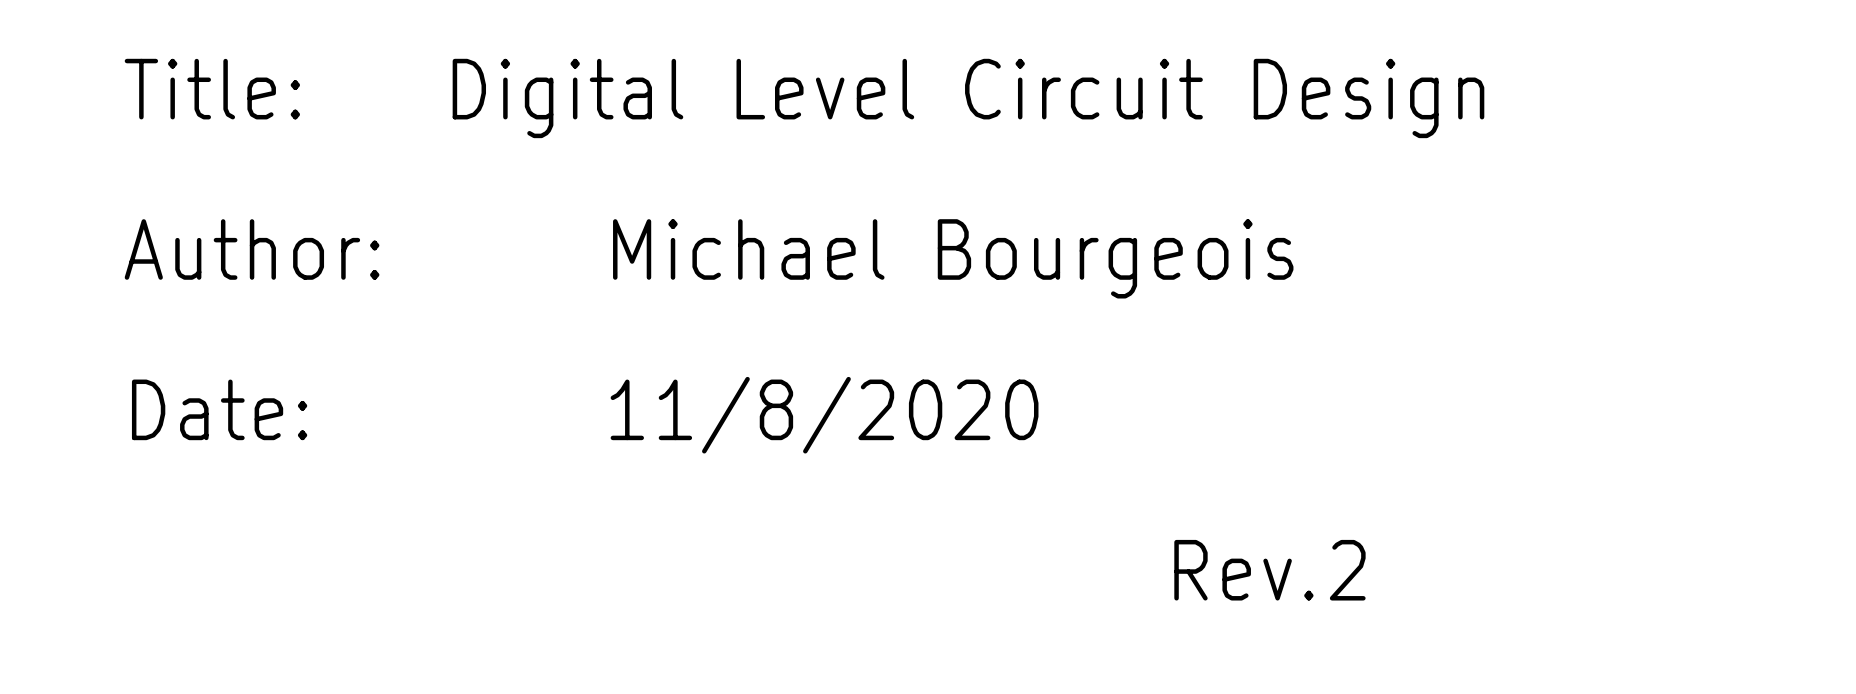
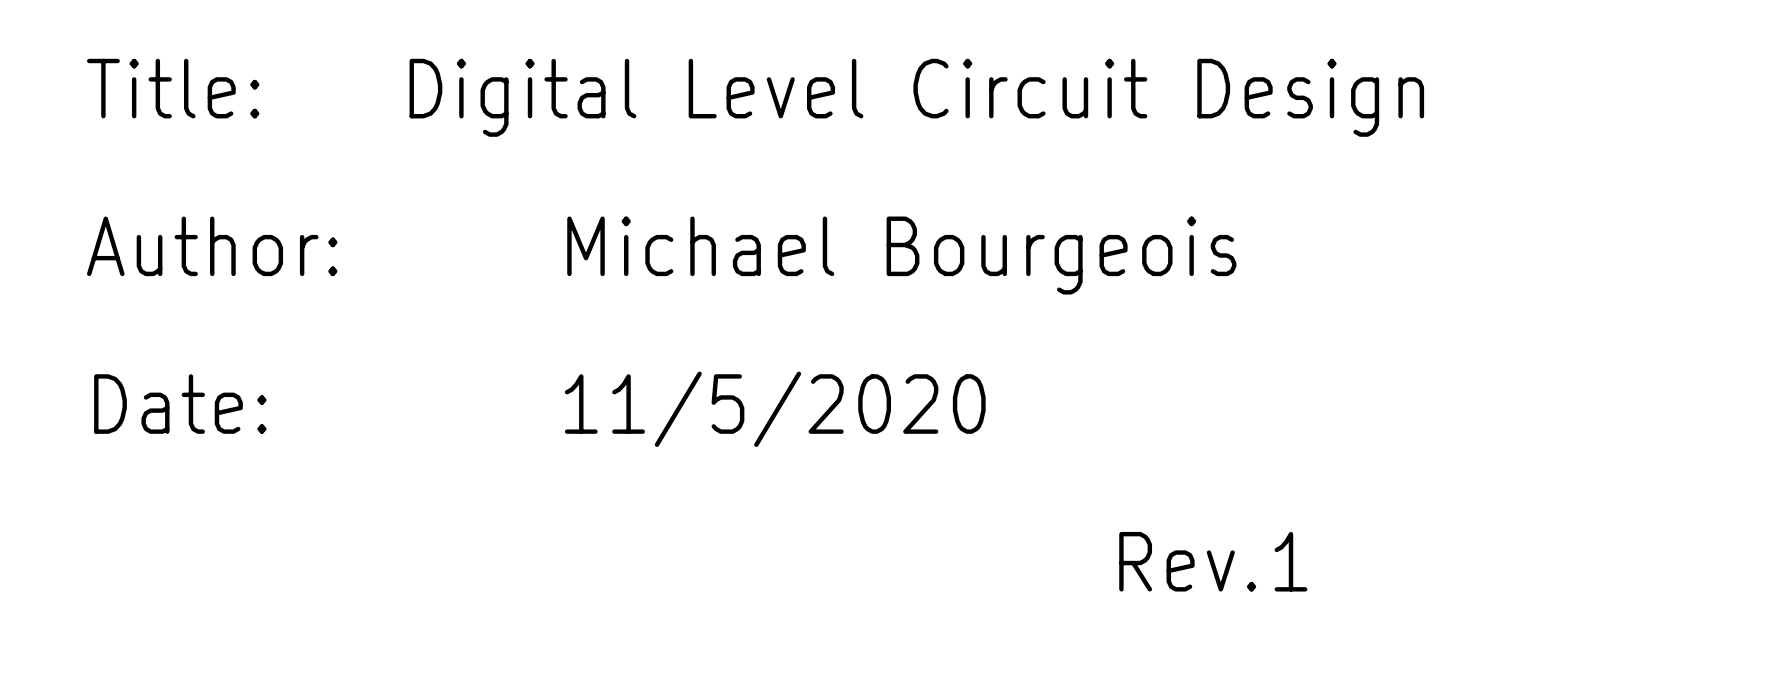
text: 11/8/2020 (824, 415) -> 11/5/2020 (775, 409)
text: 2 (1347, 570) -> 1 (1290, 561)

